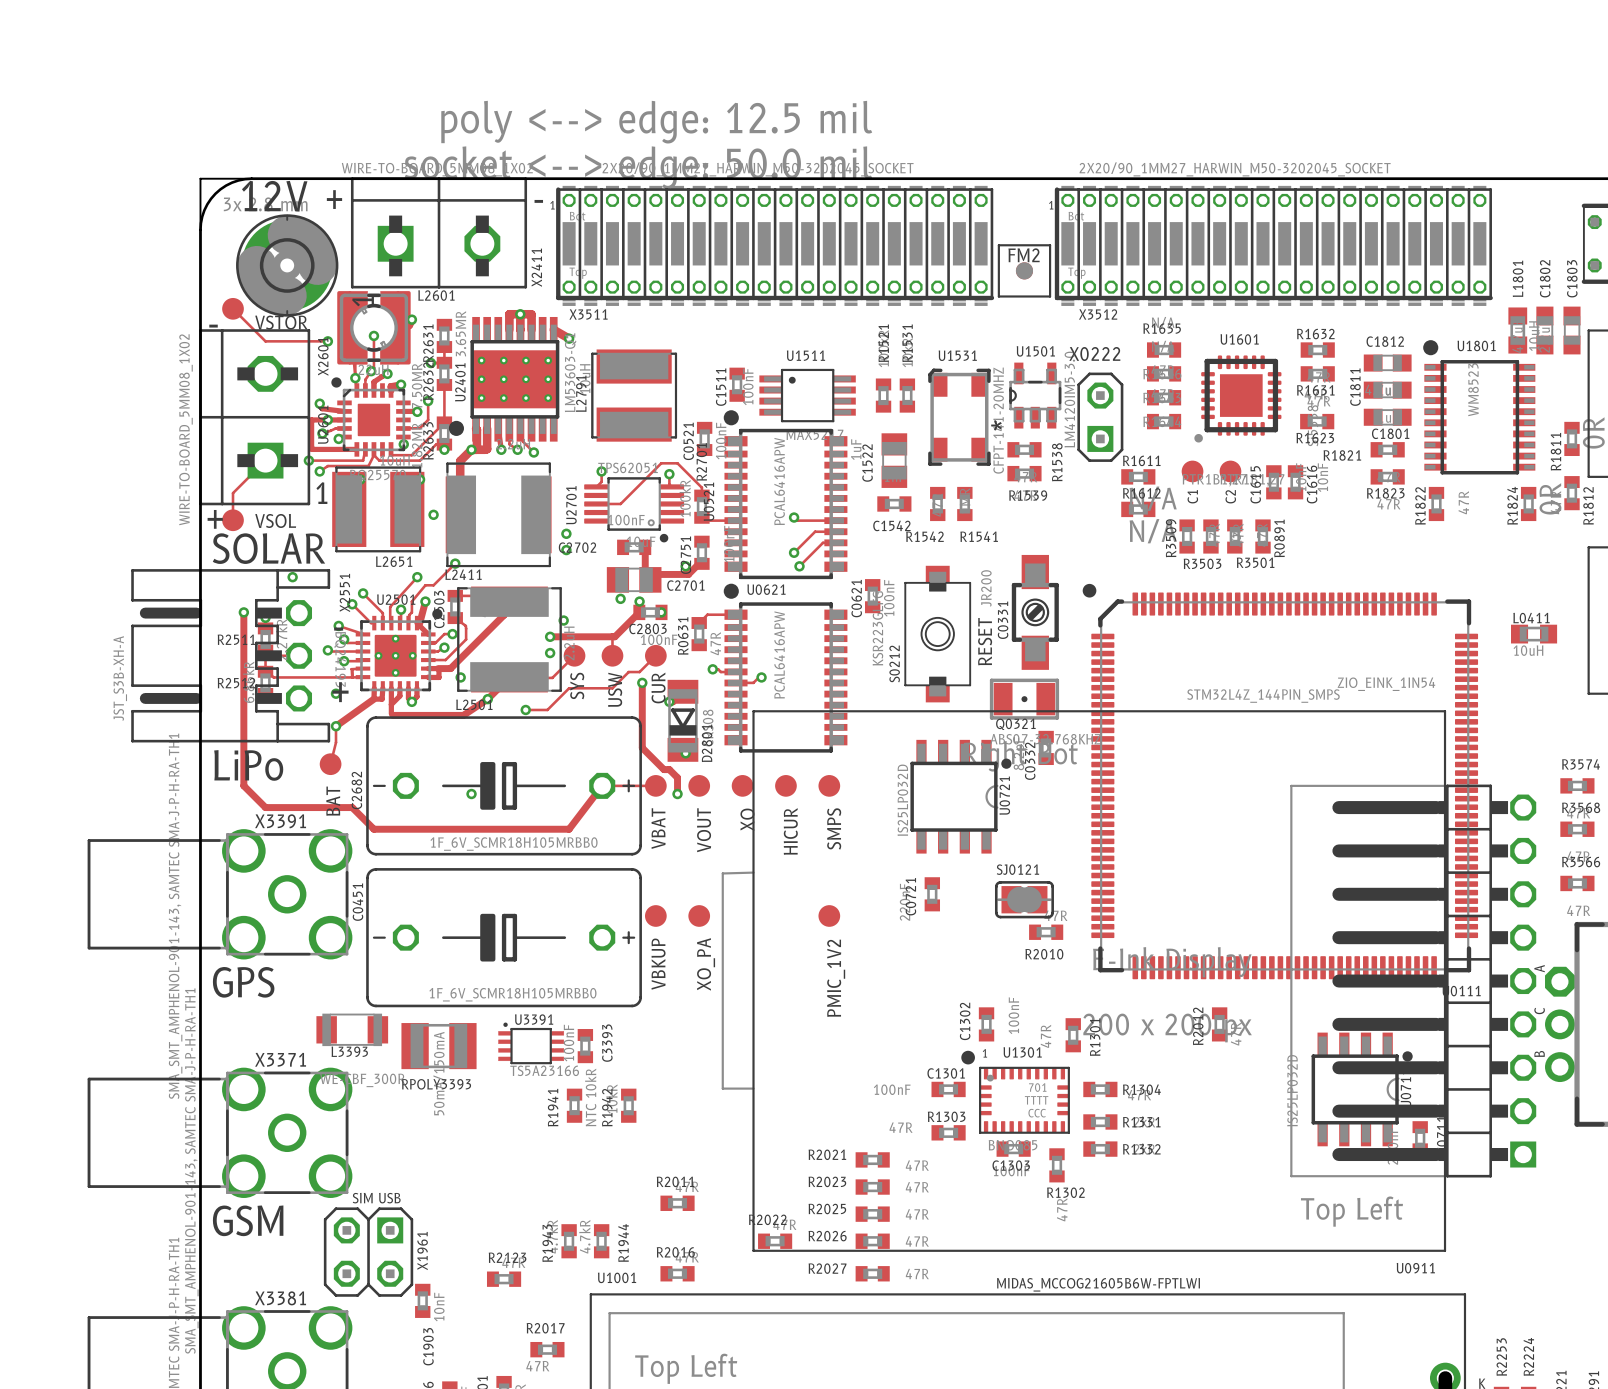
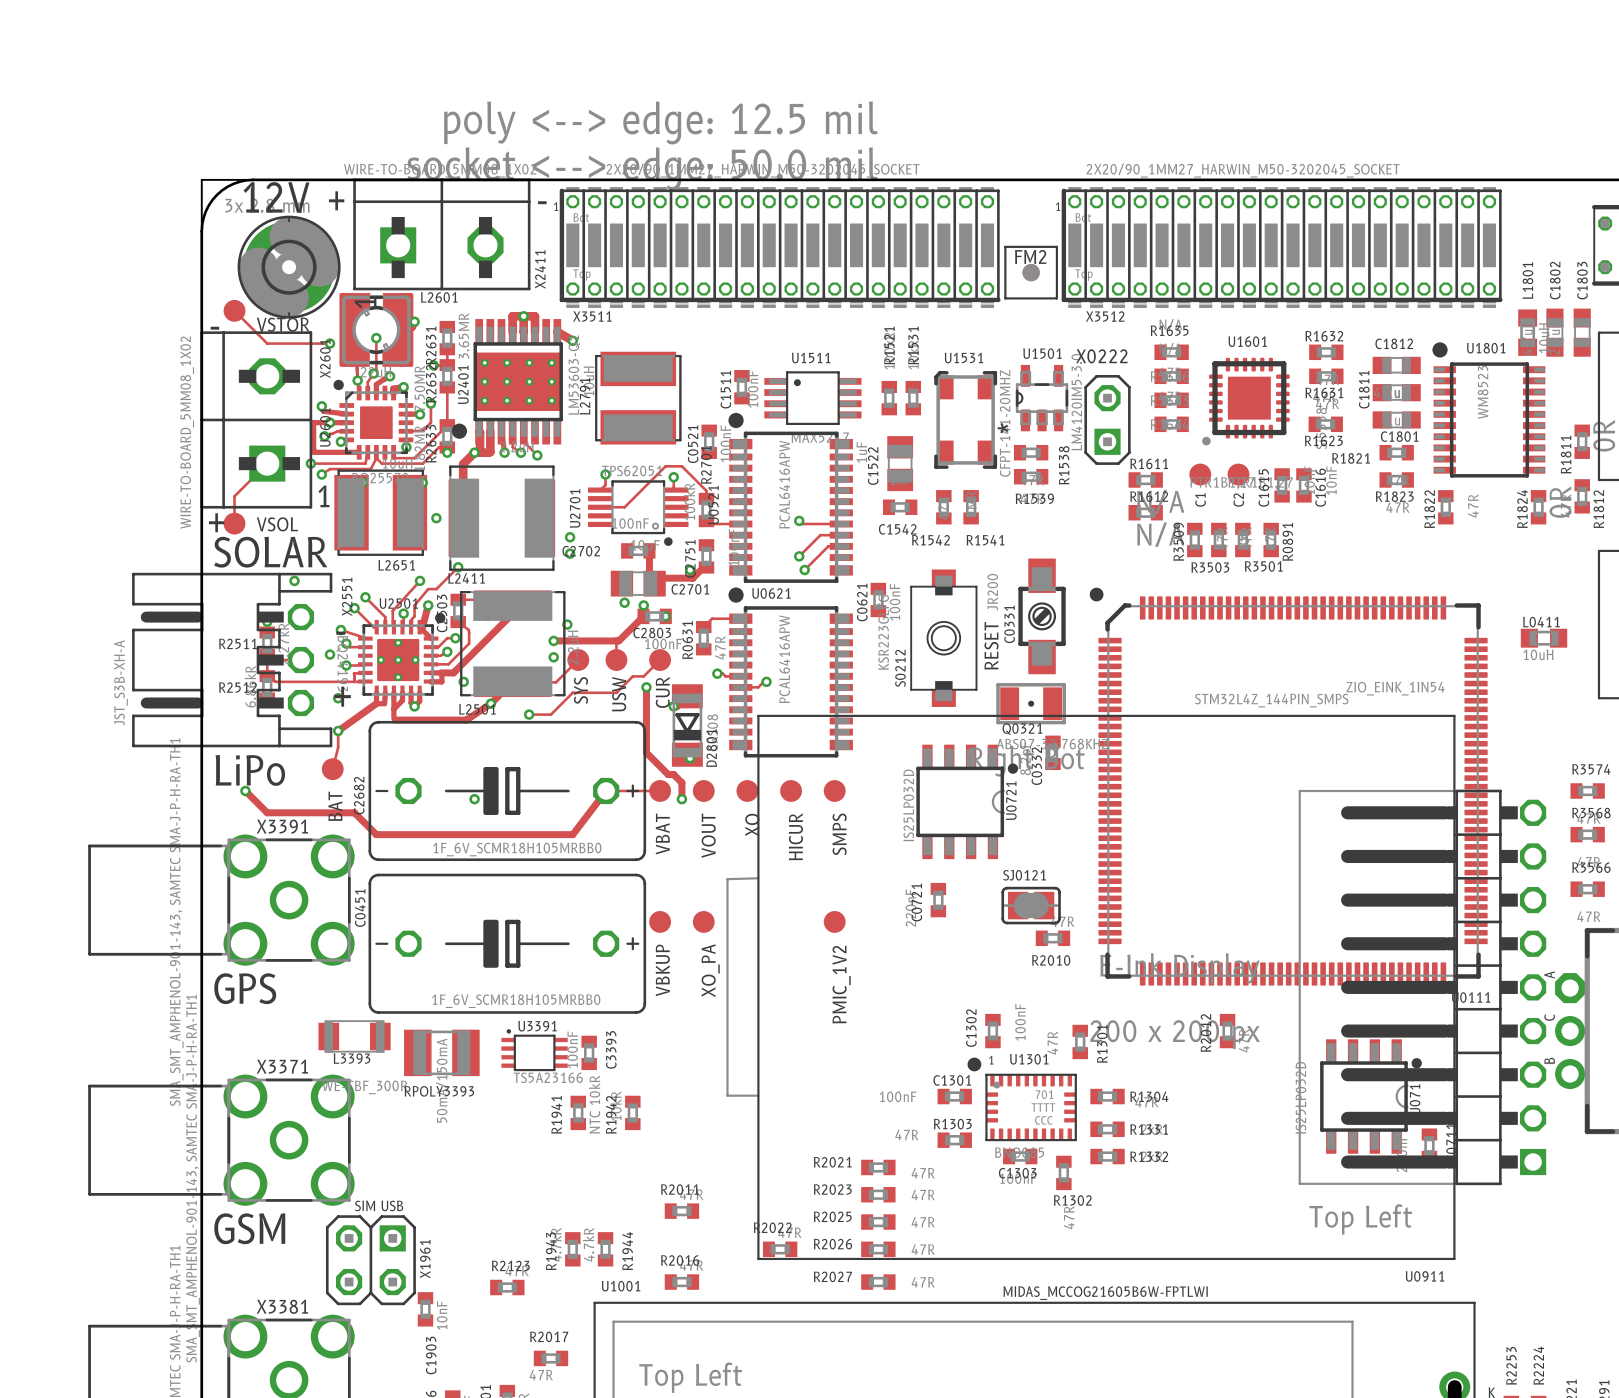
track: (243, 612) (243, 785) -> none
via: (243, 612) -> none
track: (329, 651) (362, 651) -> none
via: none -> (245, 790)

